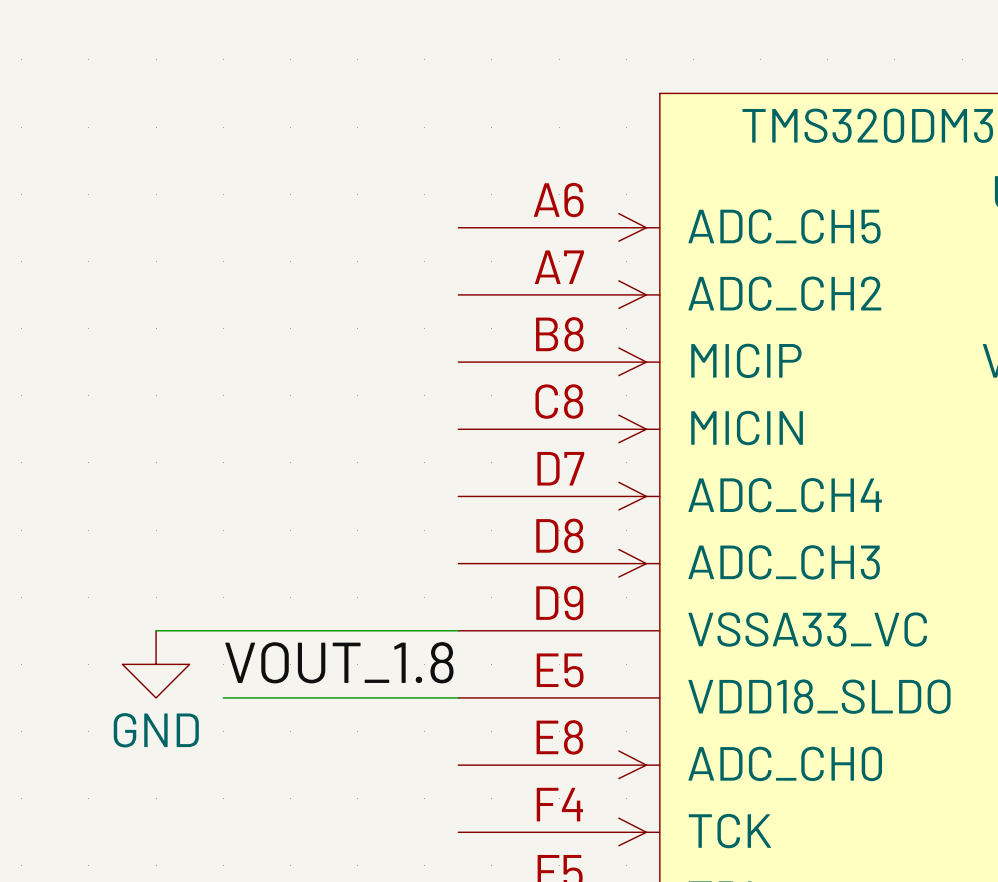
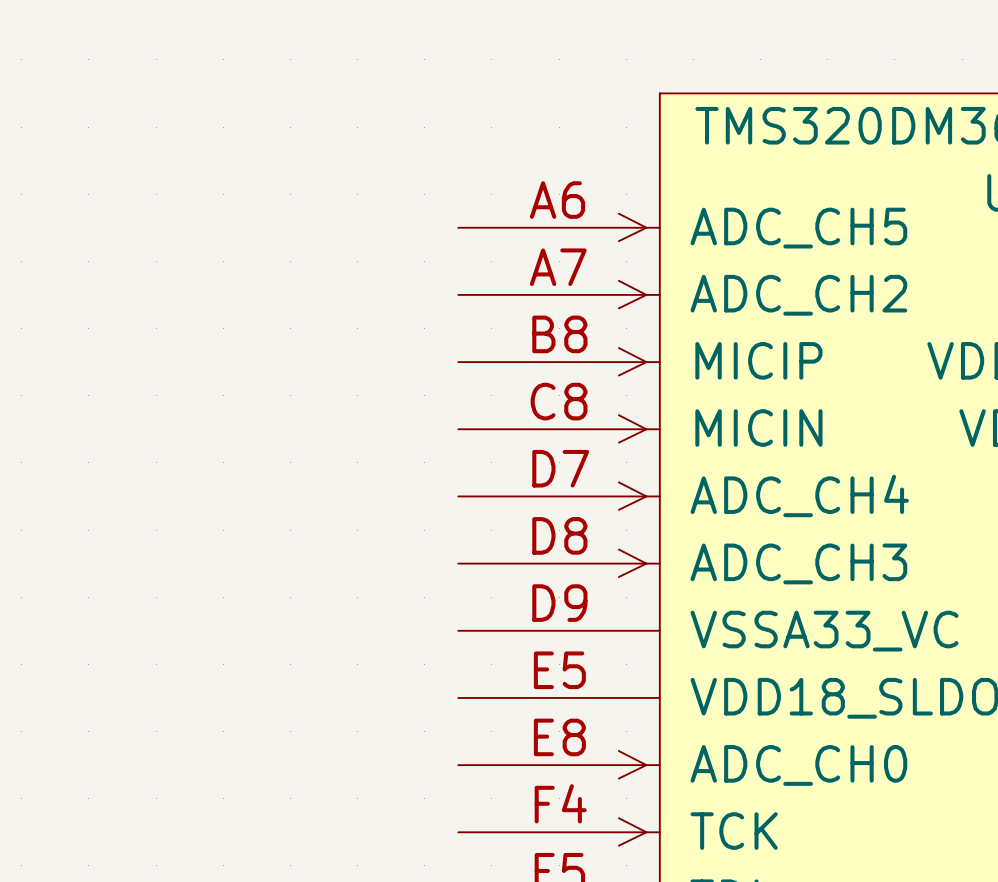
wire: (156, 630) (458, 630) -> none
label: VOUT_1.8 (339, 662) -> none
power symbol: GND (156, 664) -> none
wire: (223, 697) (458, 697) -> none

